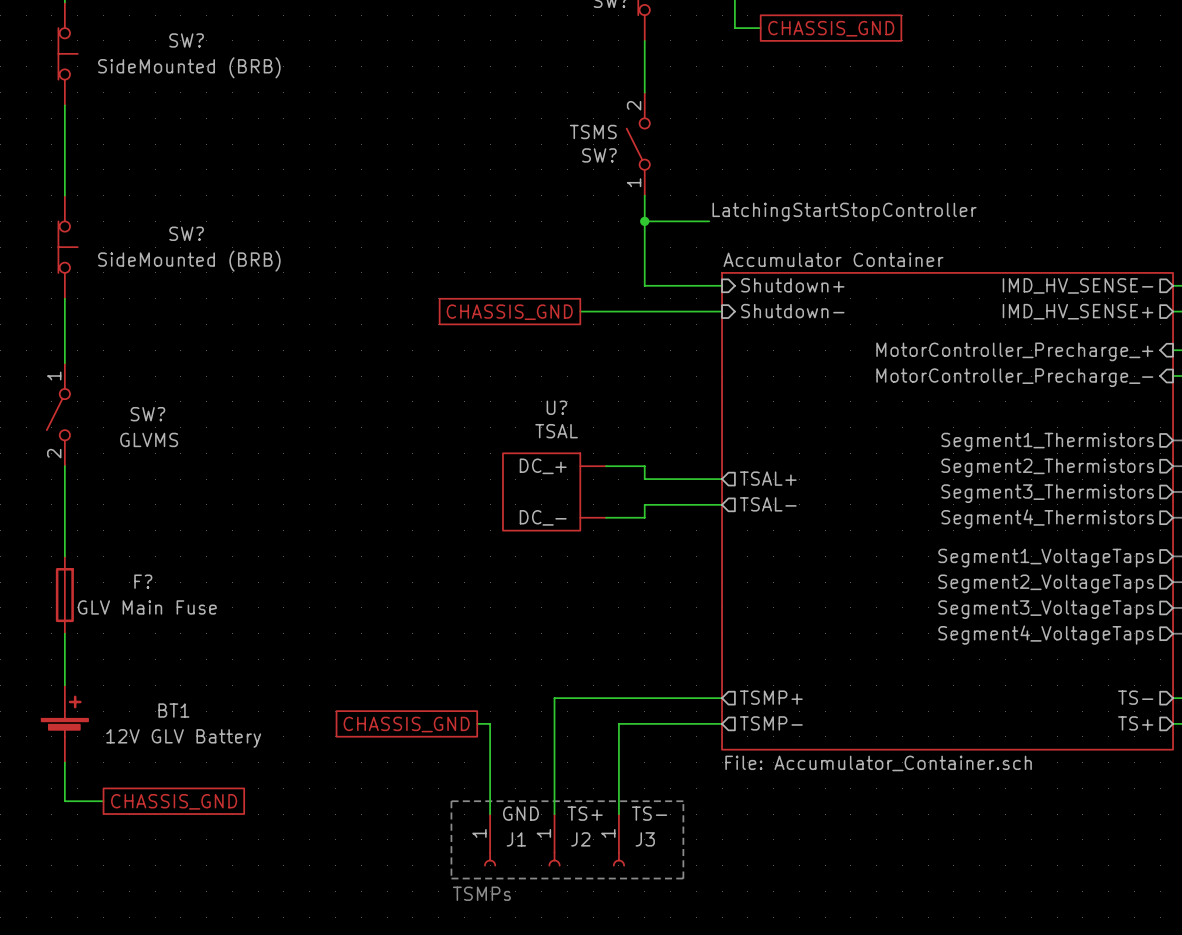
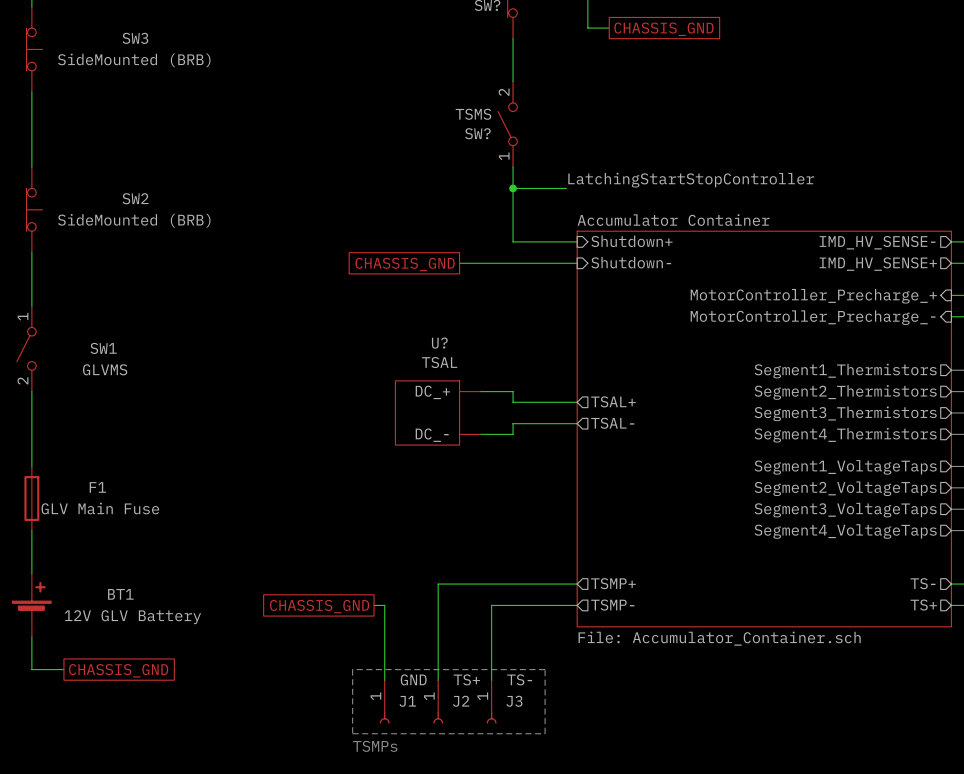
SW? name: SW? (186, 40) -> SW3 (135, 38)
SW? name: SW? (186, 233) -> SW2 (135, 198)
SW? name: SW? (147, 414) -> SW1 (103, 348)
F? name: F? (143, 581) -> F1 (97, 487)

